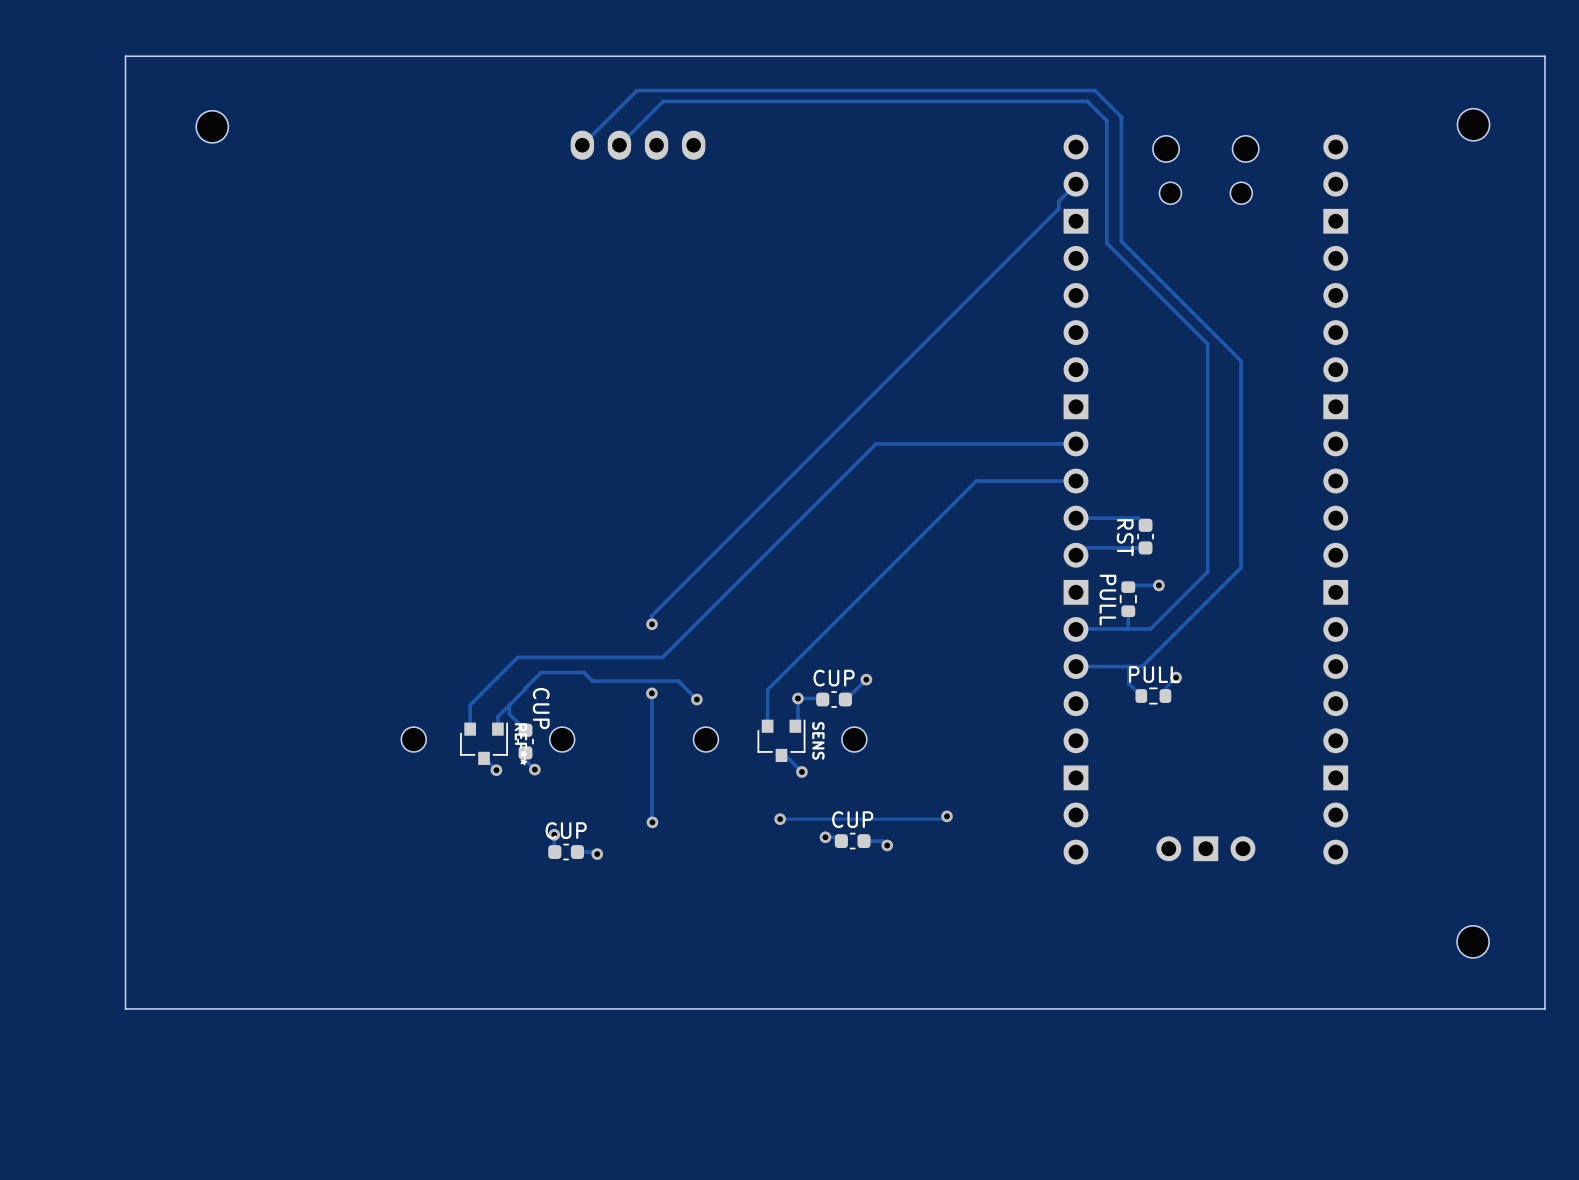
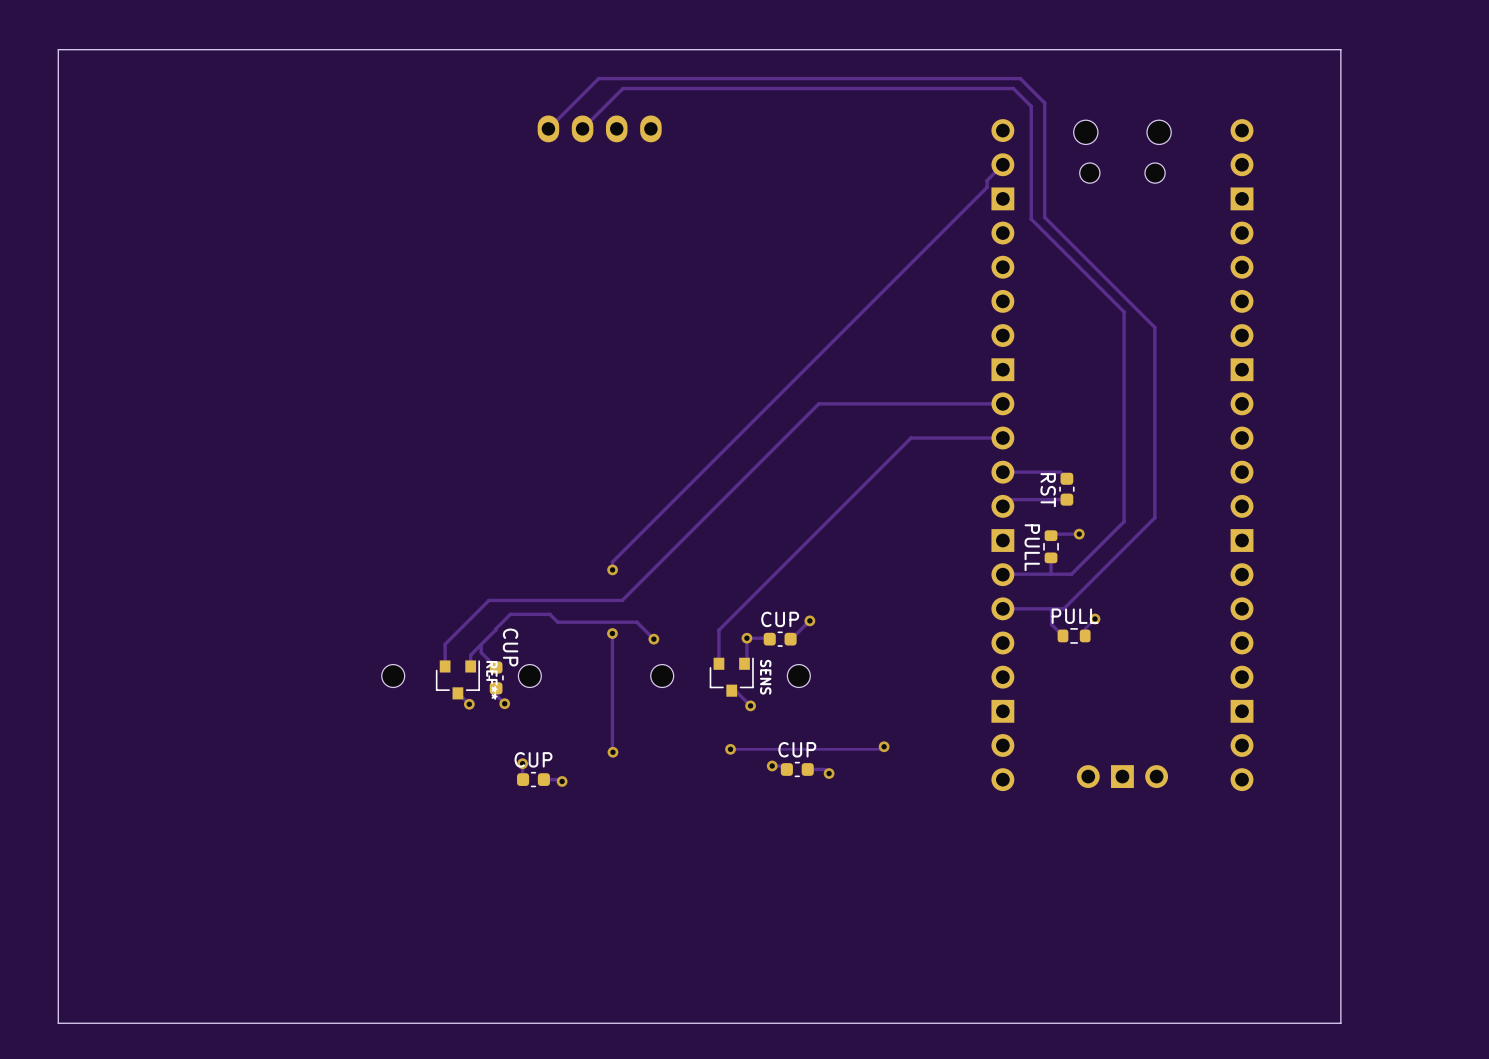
board edge: (1544, 56) (125, 56) (125, 1008) (1544, 1008) (1544, 56) -> (1340, 49) (1340, 1023) (58, 1023) (58, 49) (1340, 49)
part: (1473, 124) -> none
part: (212, 126) -> none
part: (1473, 941) -> none

